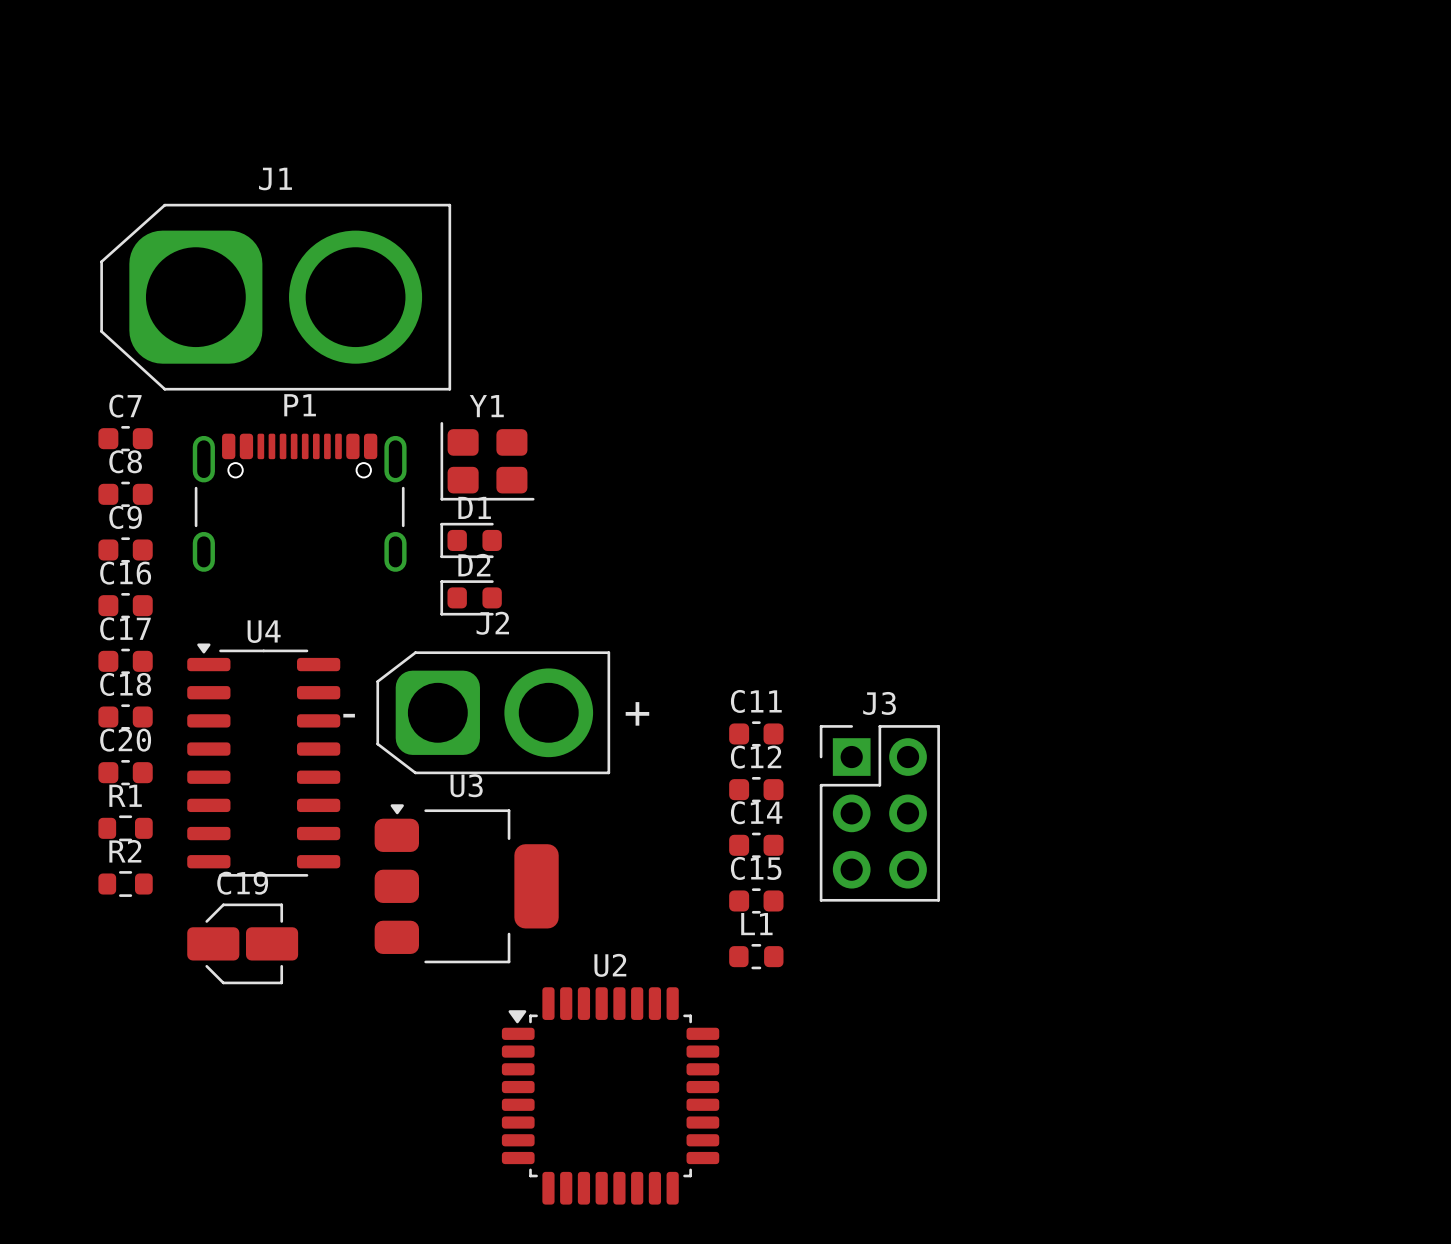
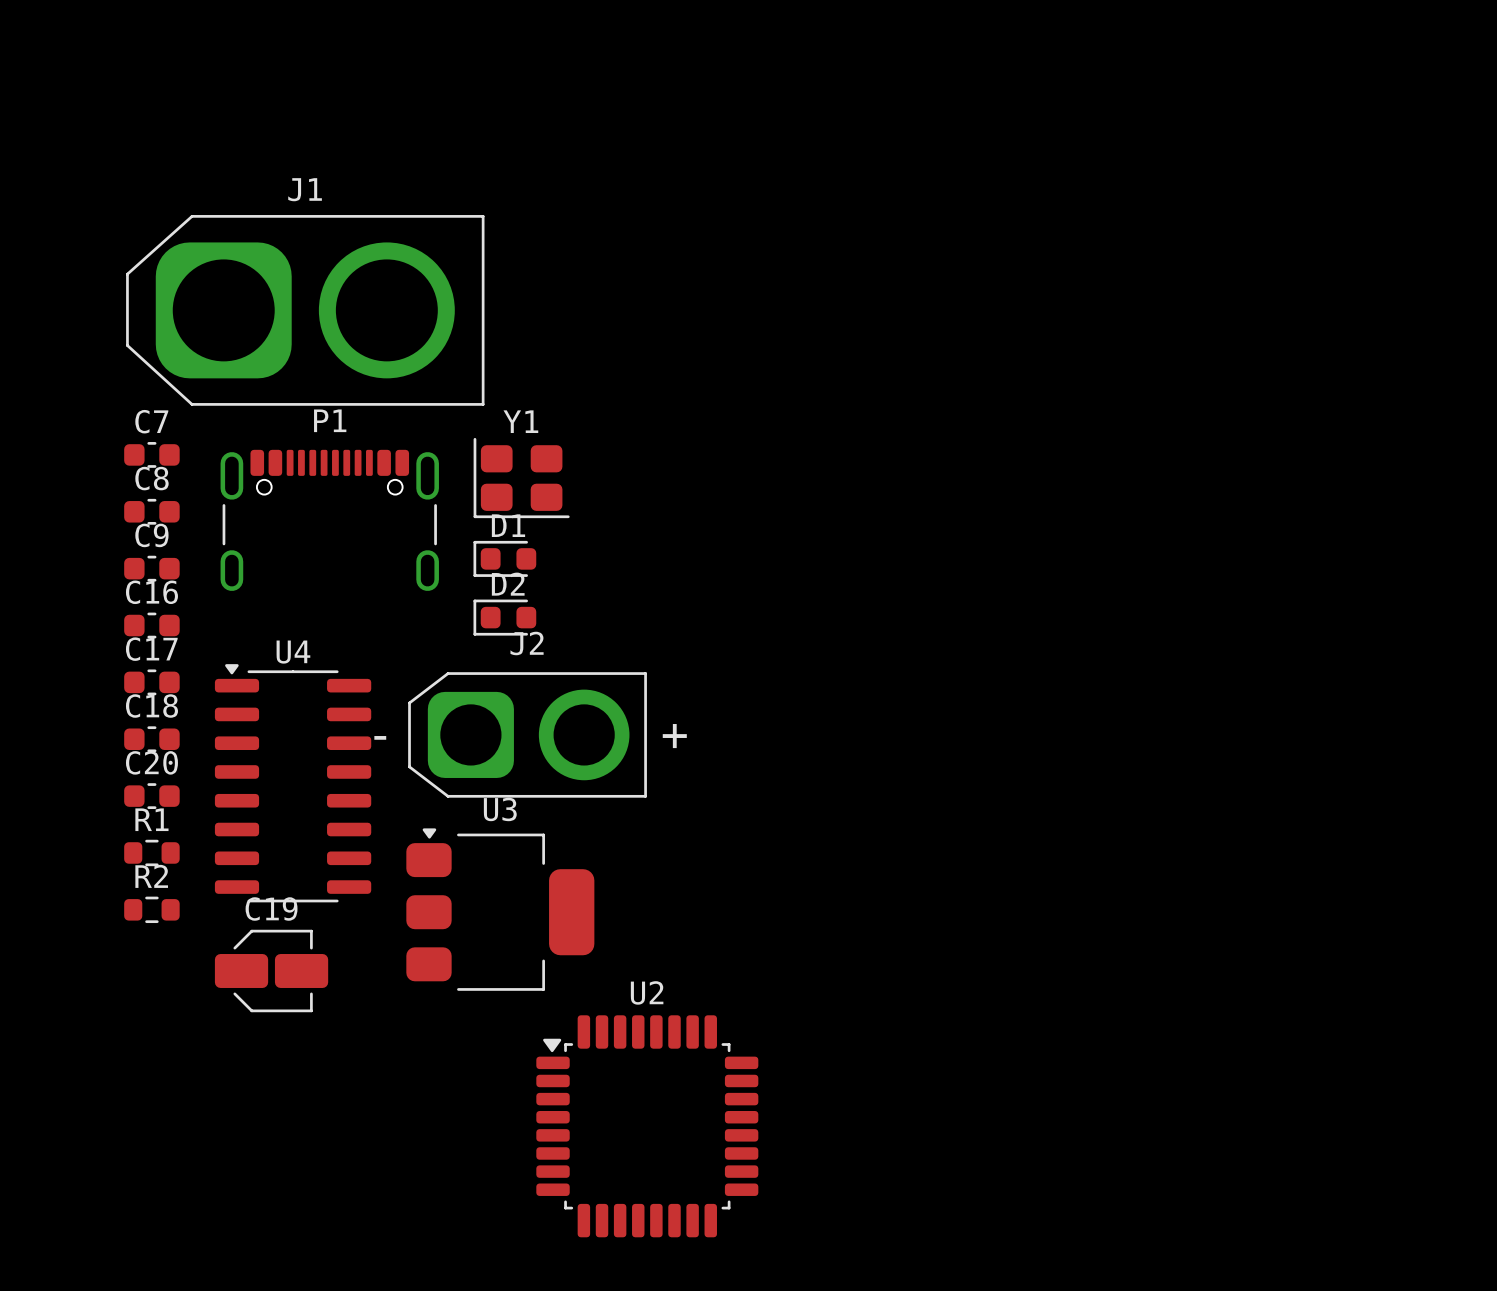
C11: (756, 733) -> none
C12: (756, 789) -> none
J3: (879, 813) -> none
C14: (756, 845) -> none
C15: (756, 900) -> none
L1: (756, 956) -> none

